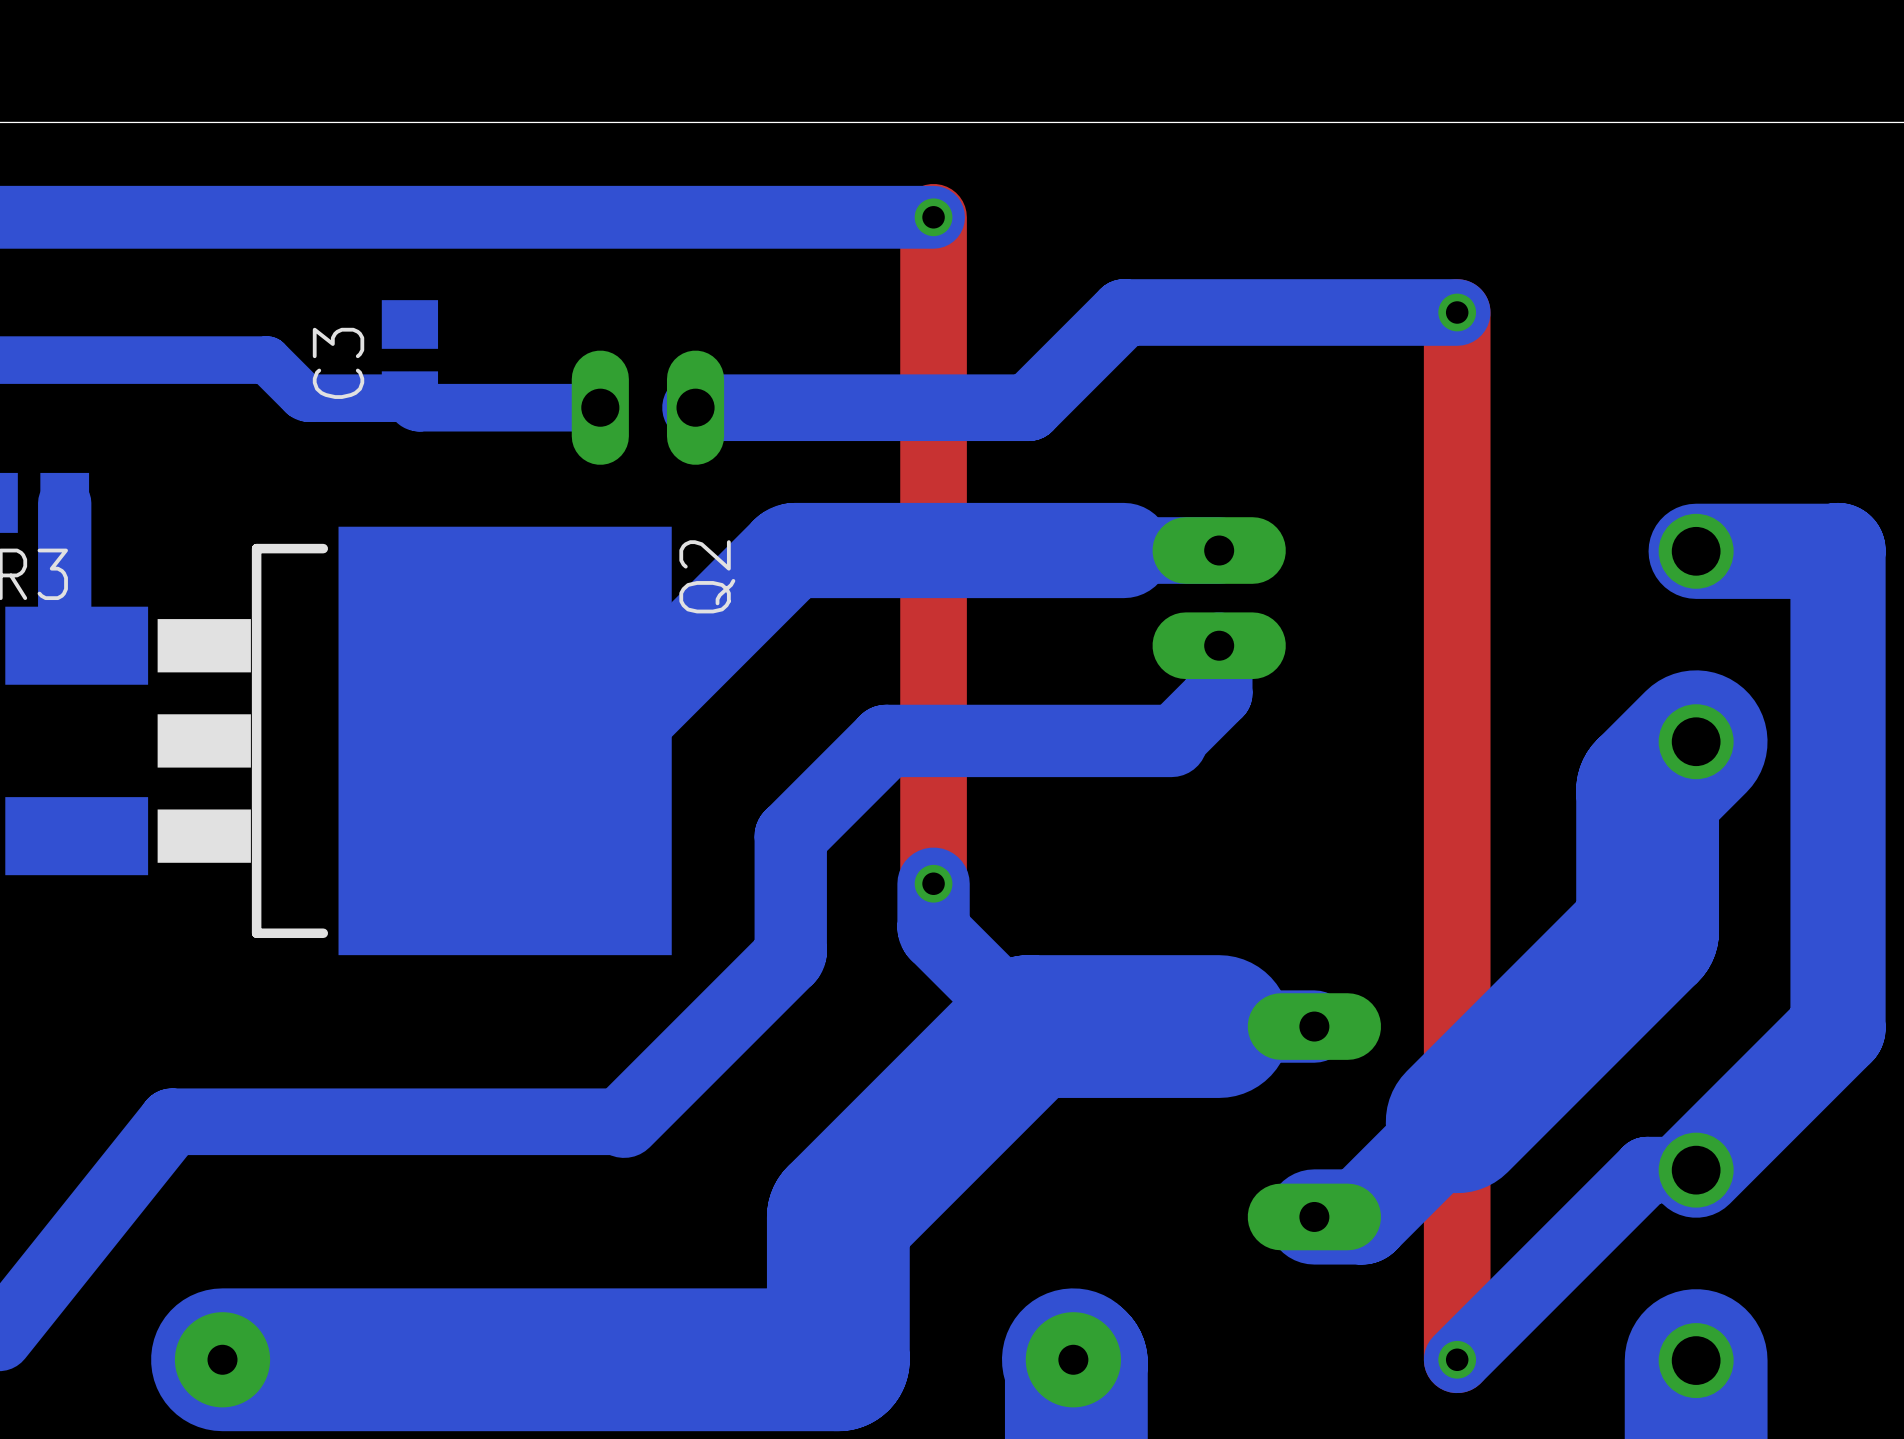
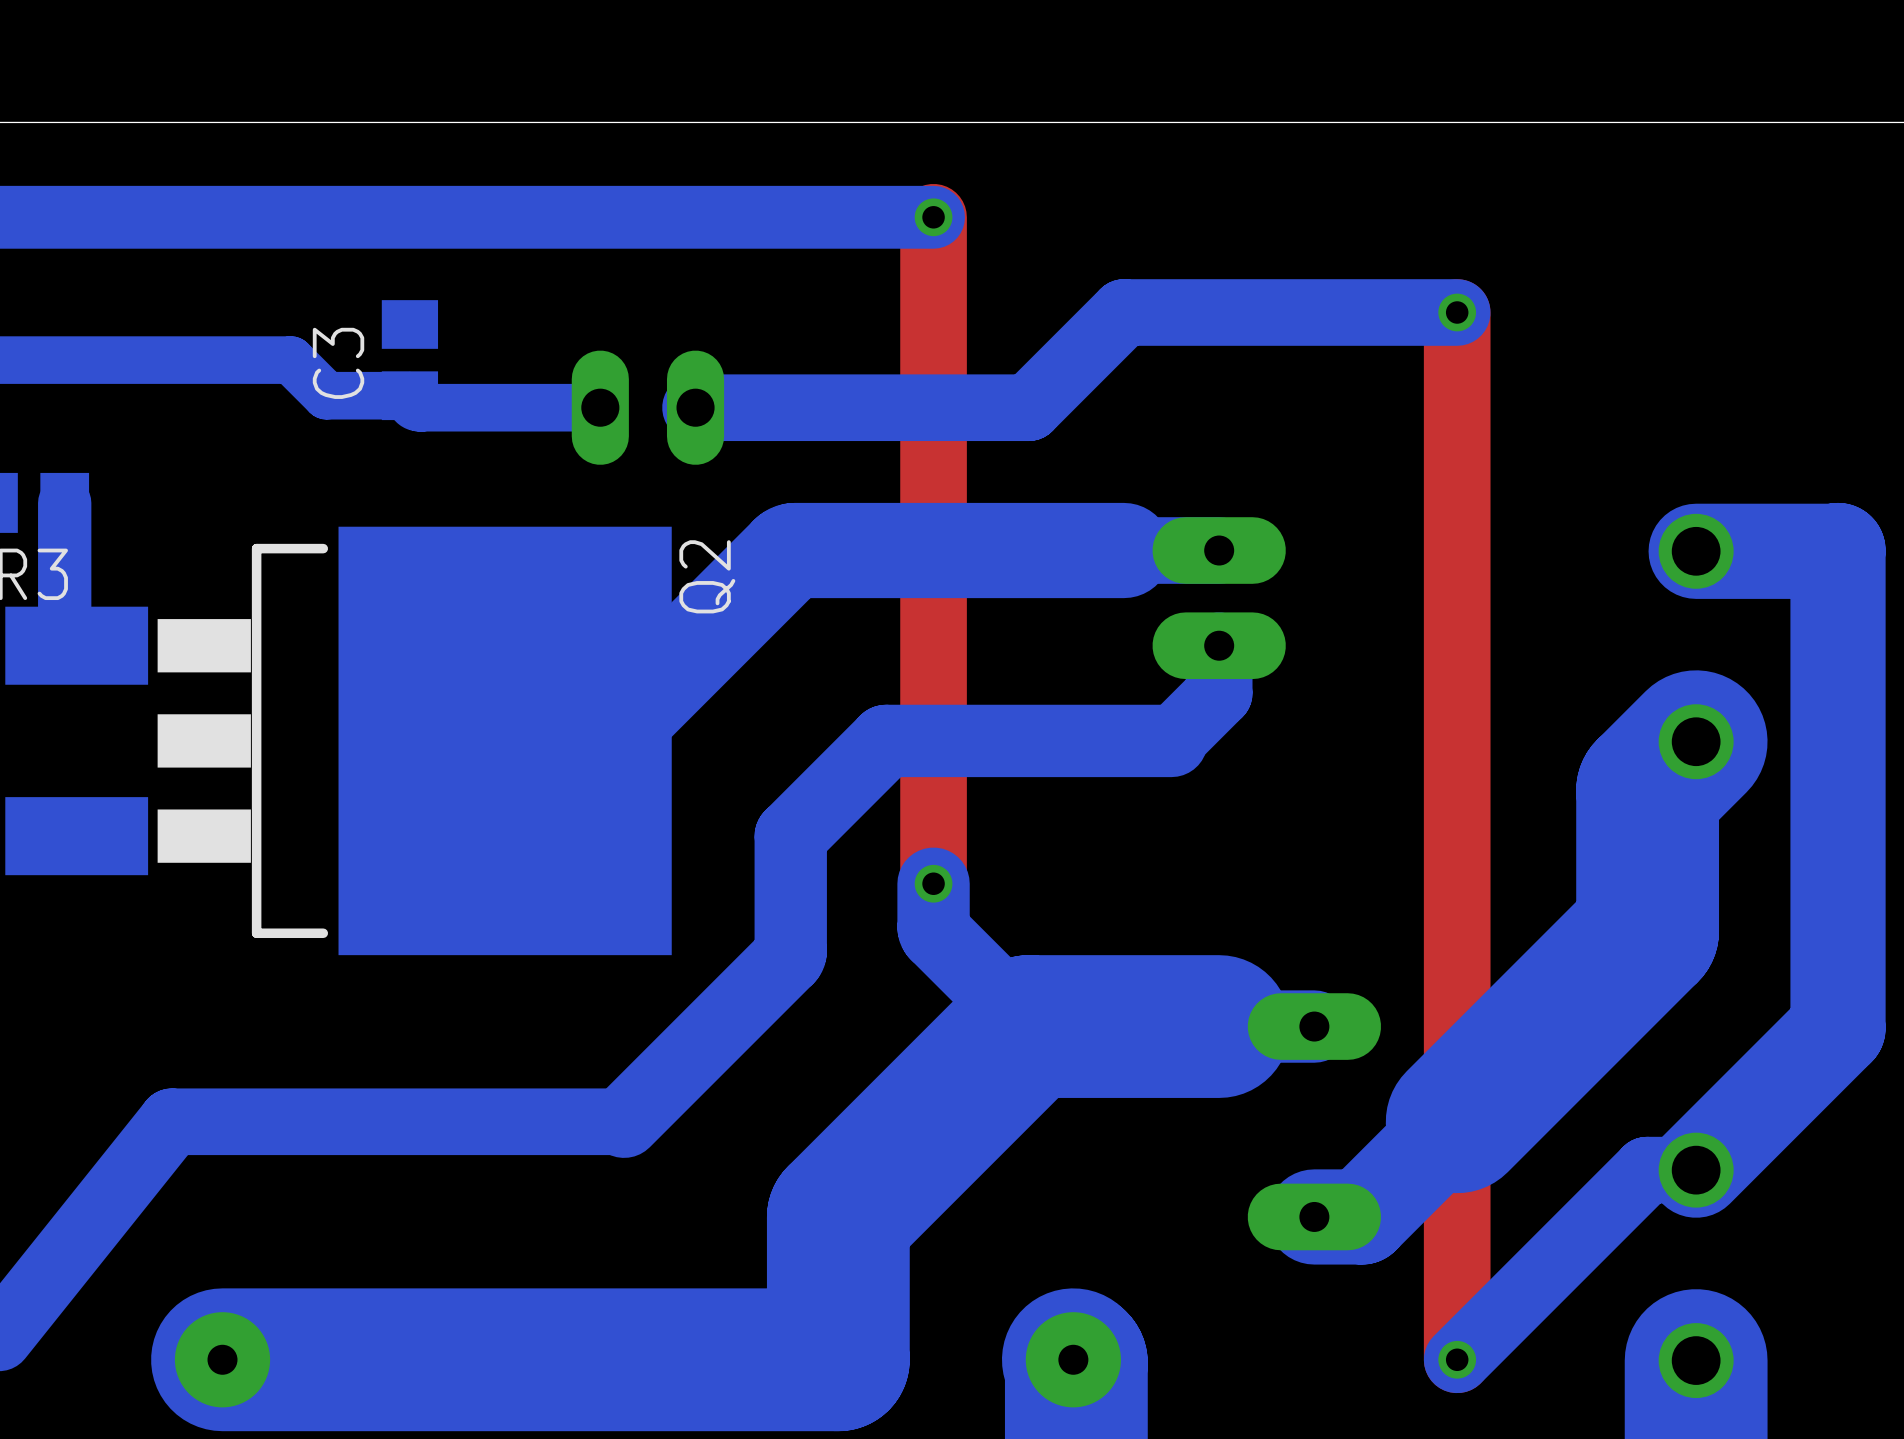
bottom track: (267, 360) (306, 397) (409, 398) -> (267, 360) (290, 360) (326, 395) (409, 395) (421, 407)

